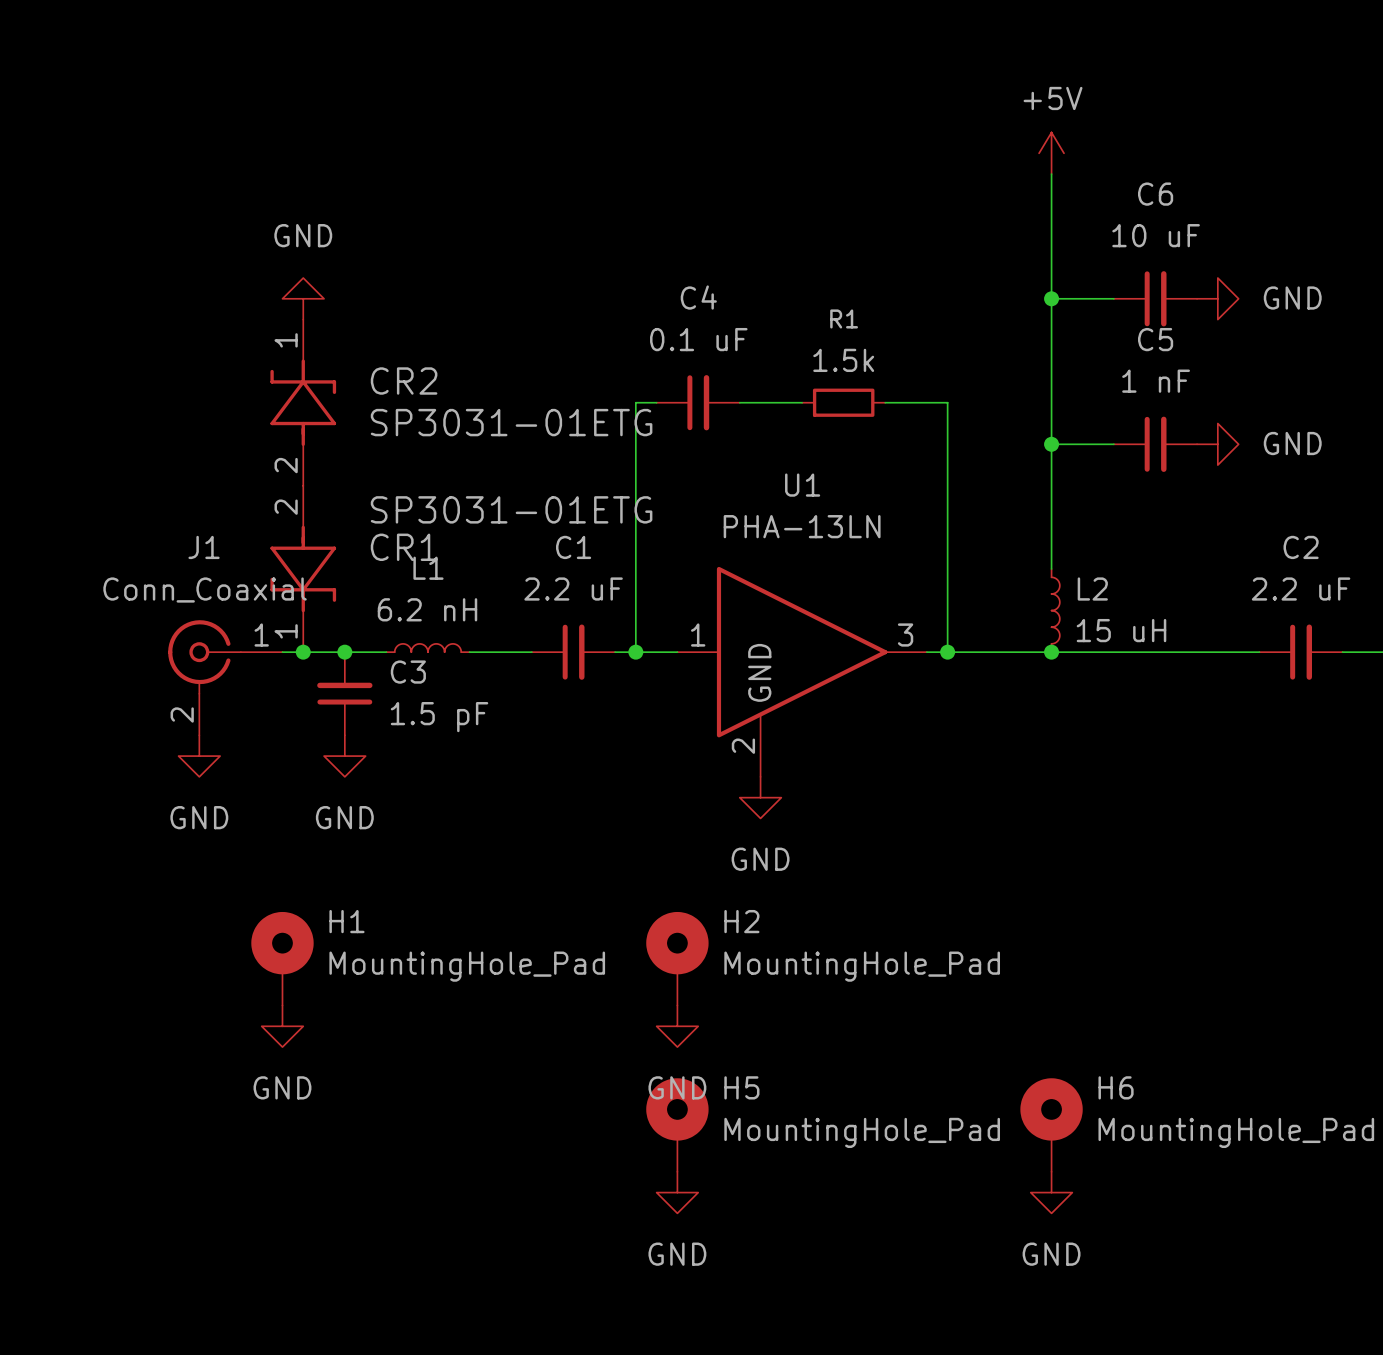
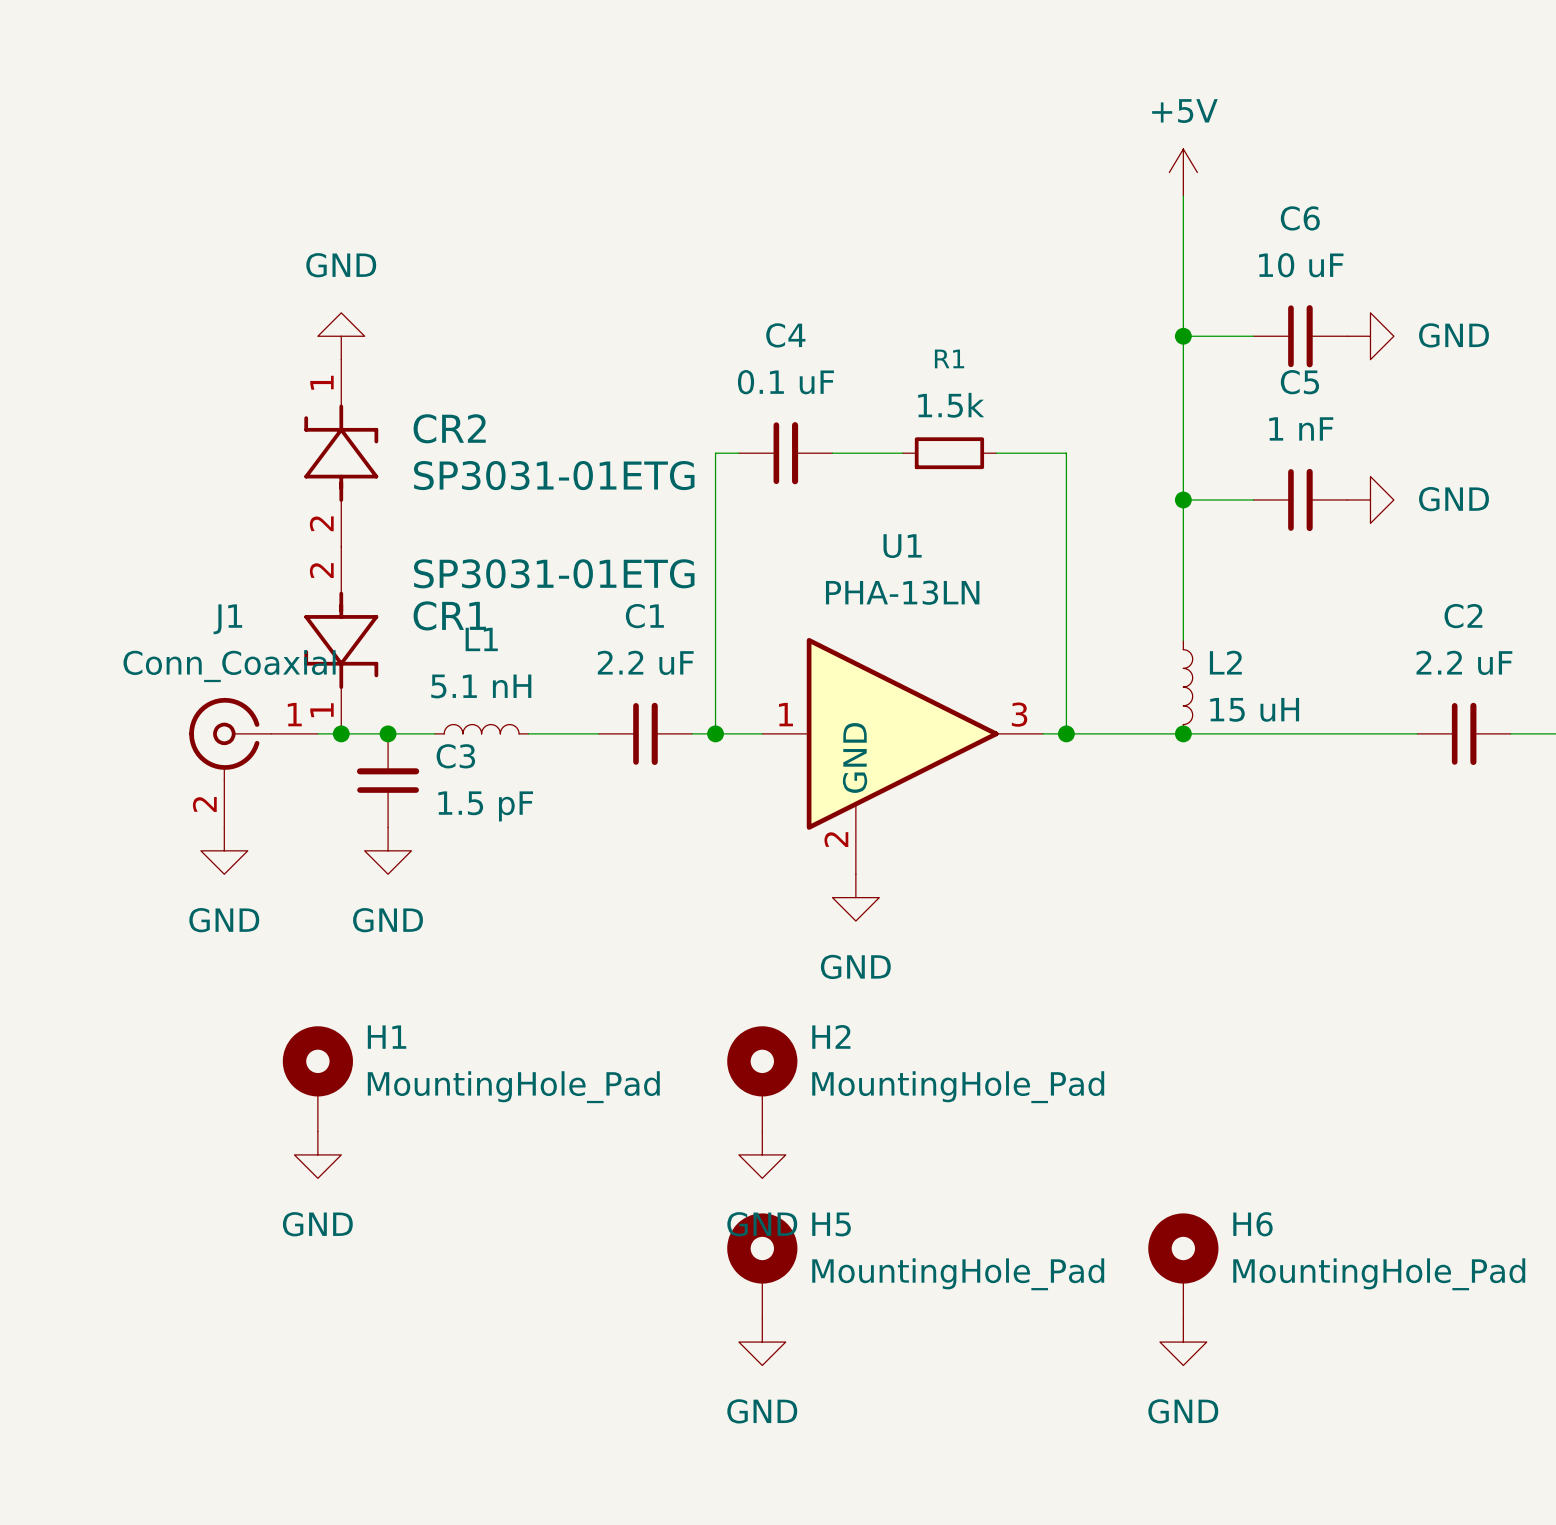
L1 value: 6.2 nH (427, 609) -> 5.1 nH (481, 686)

